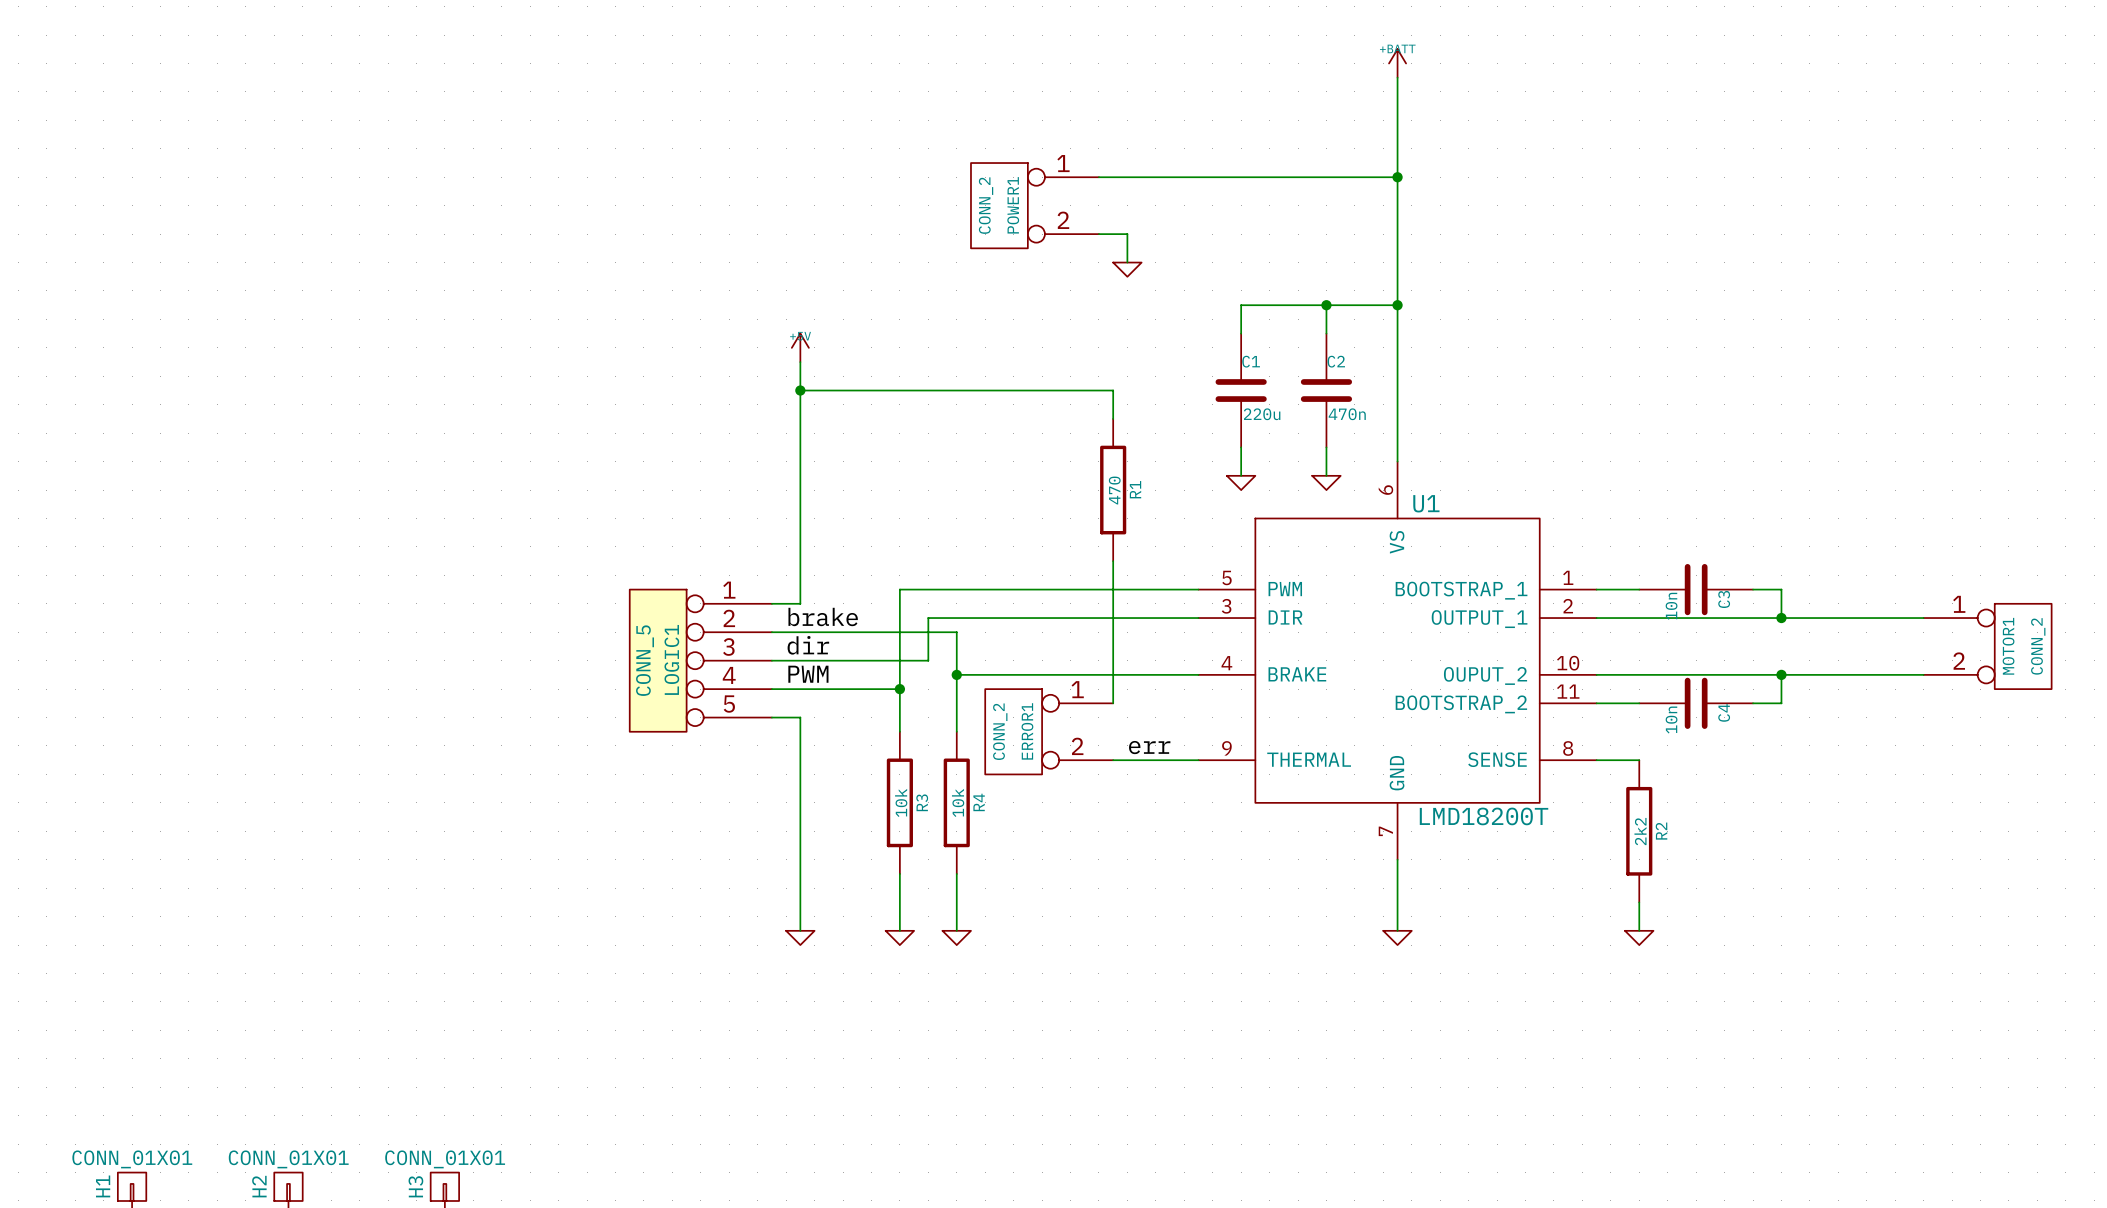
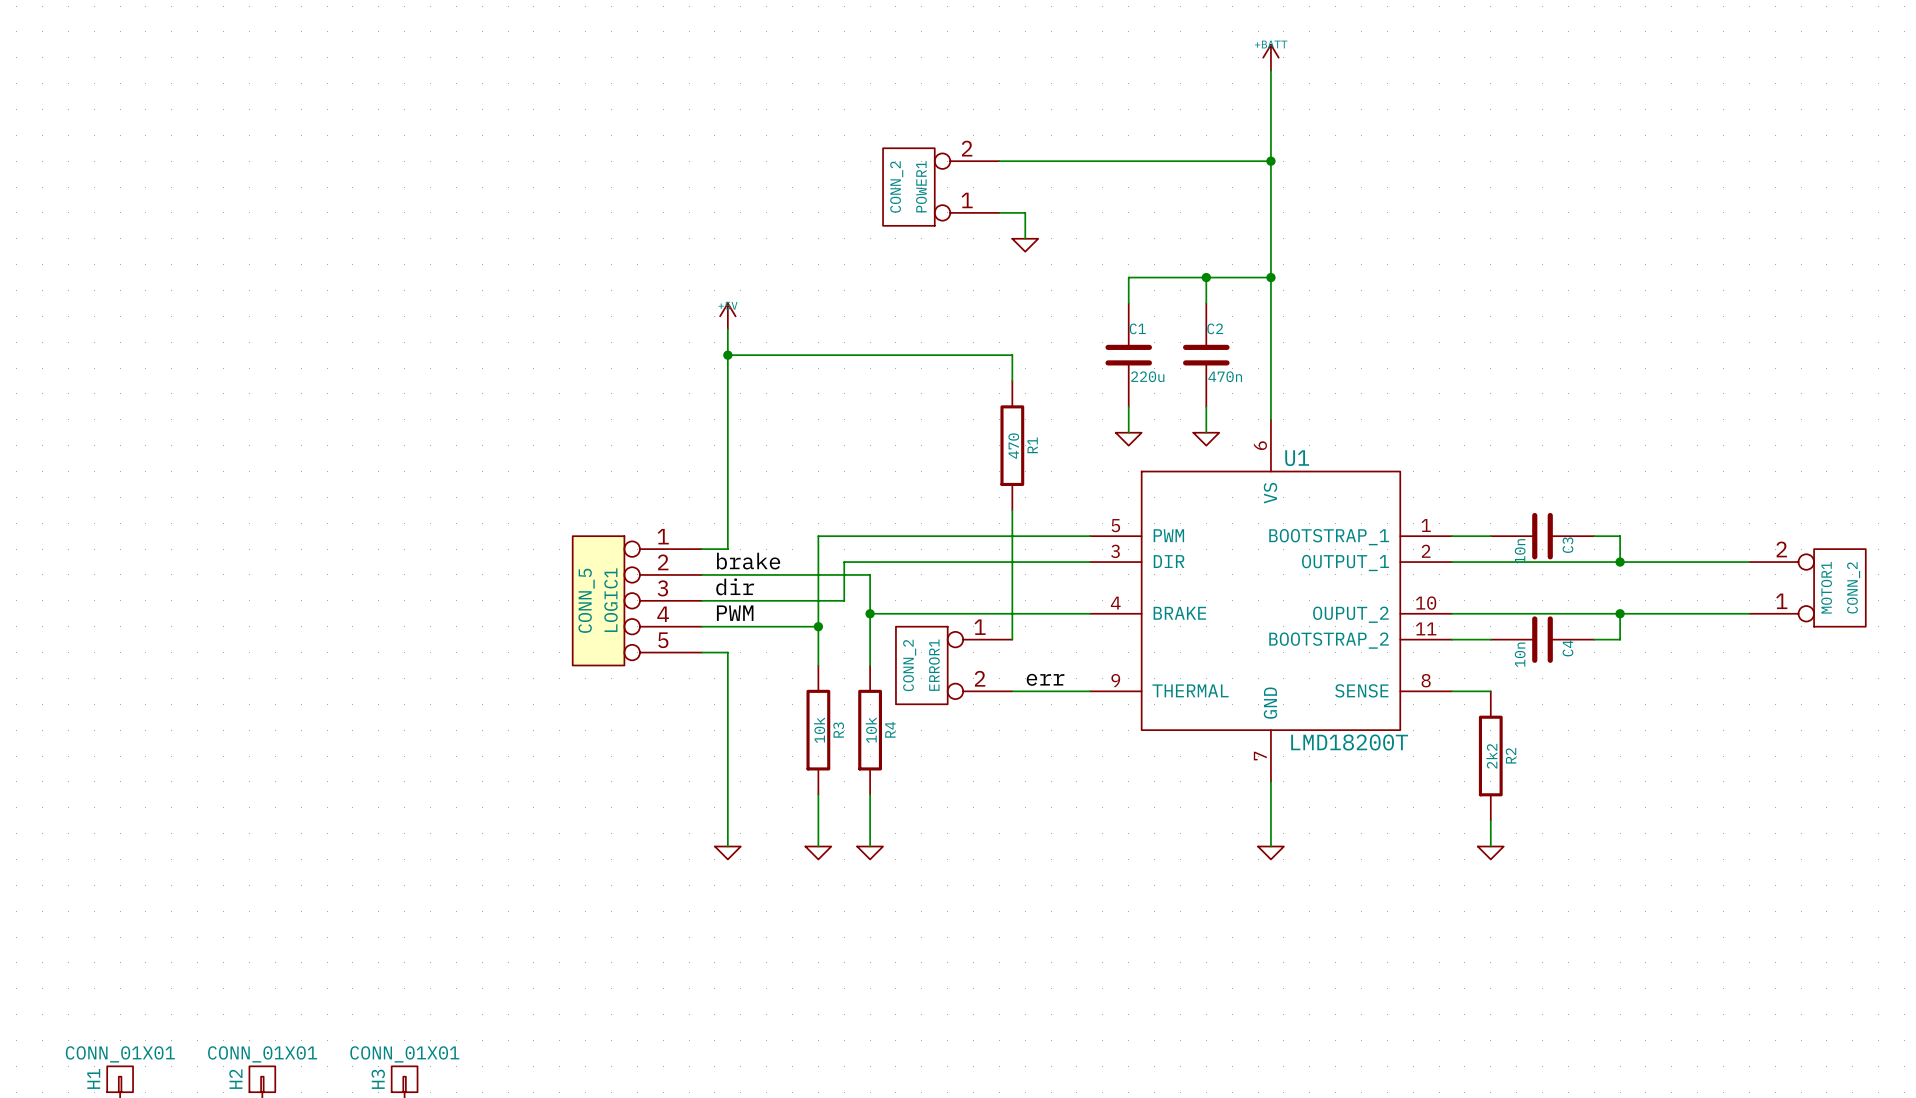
POWER1 flip: as is (999, 205) -> up-down (908, 187)
MOTOR1 flip: as is (2023, 646) -> up-down (1839, 587)

